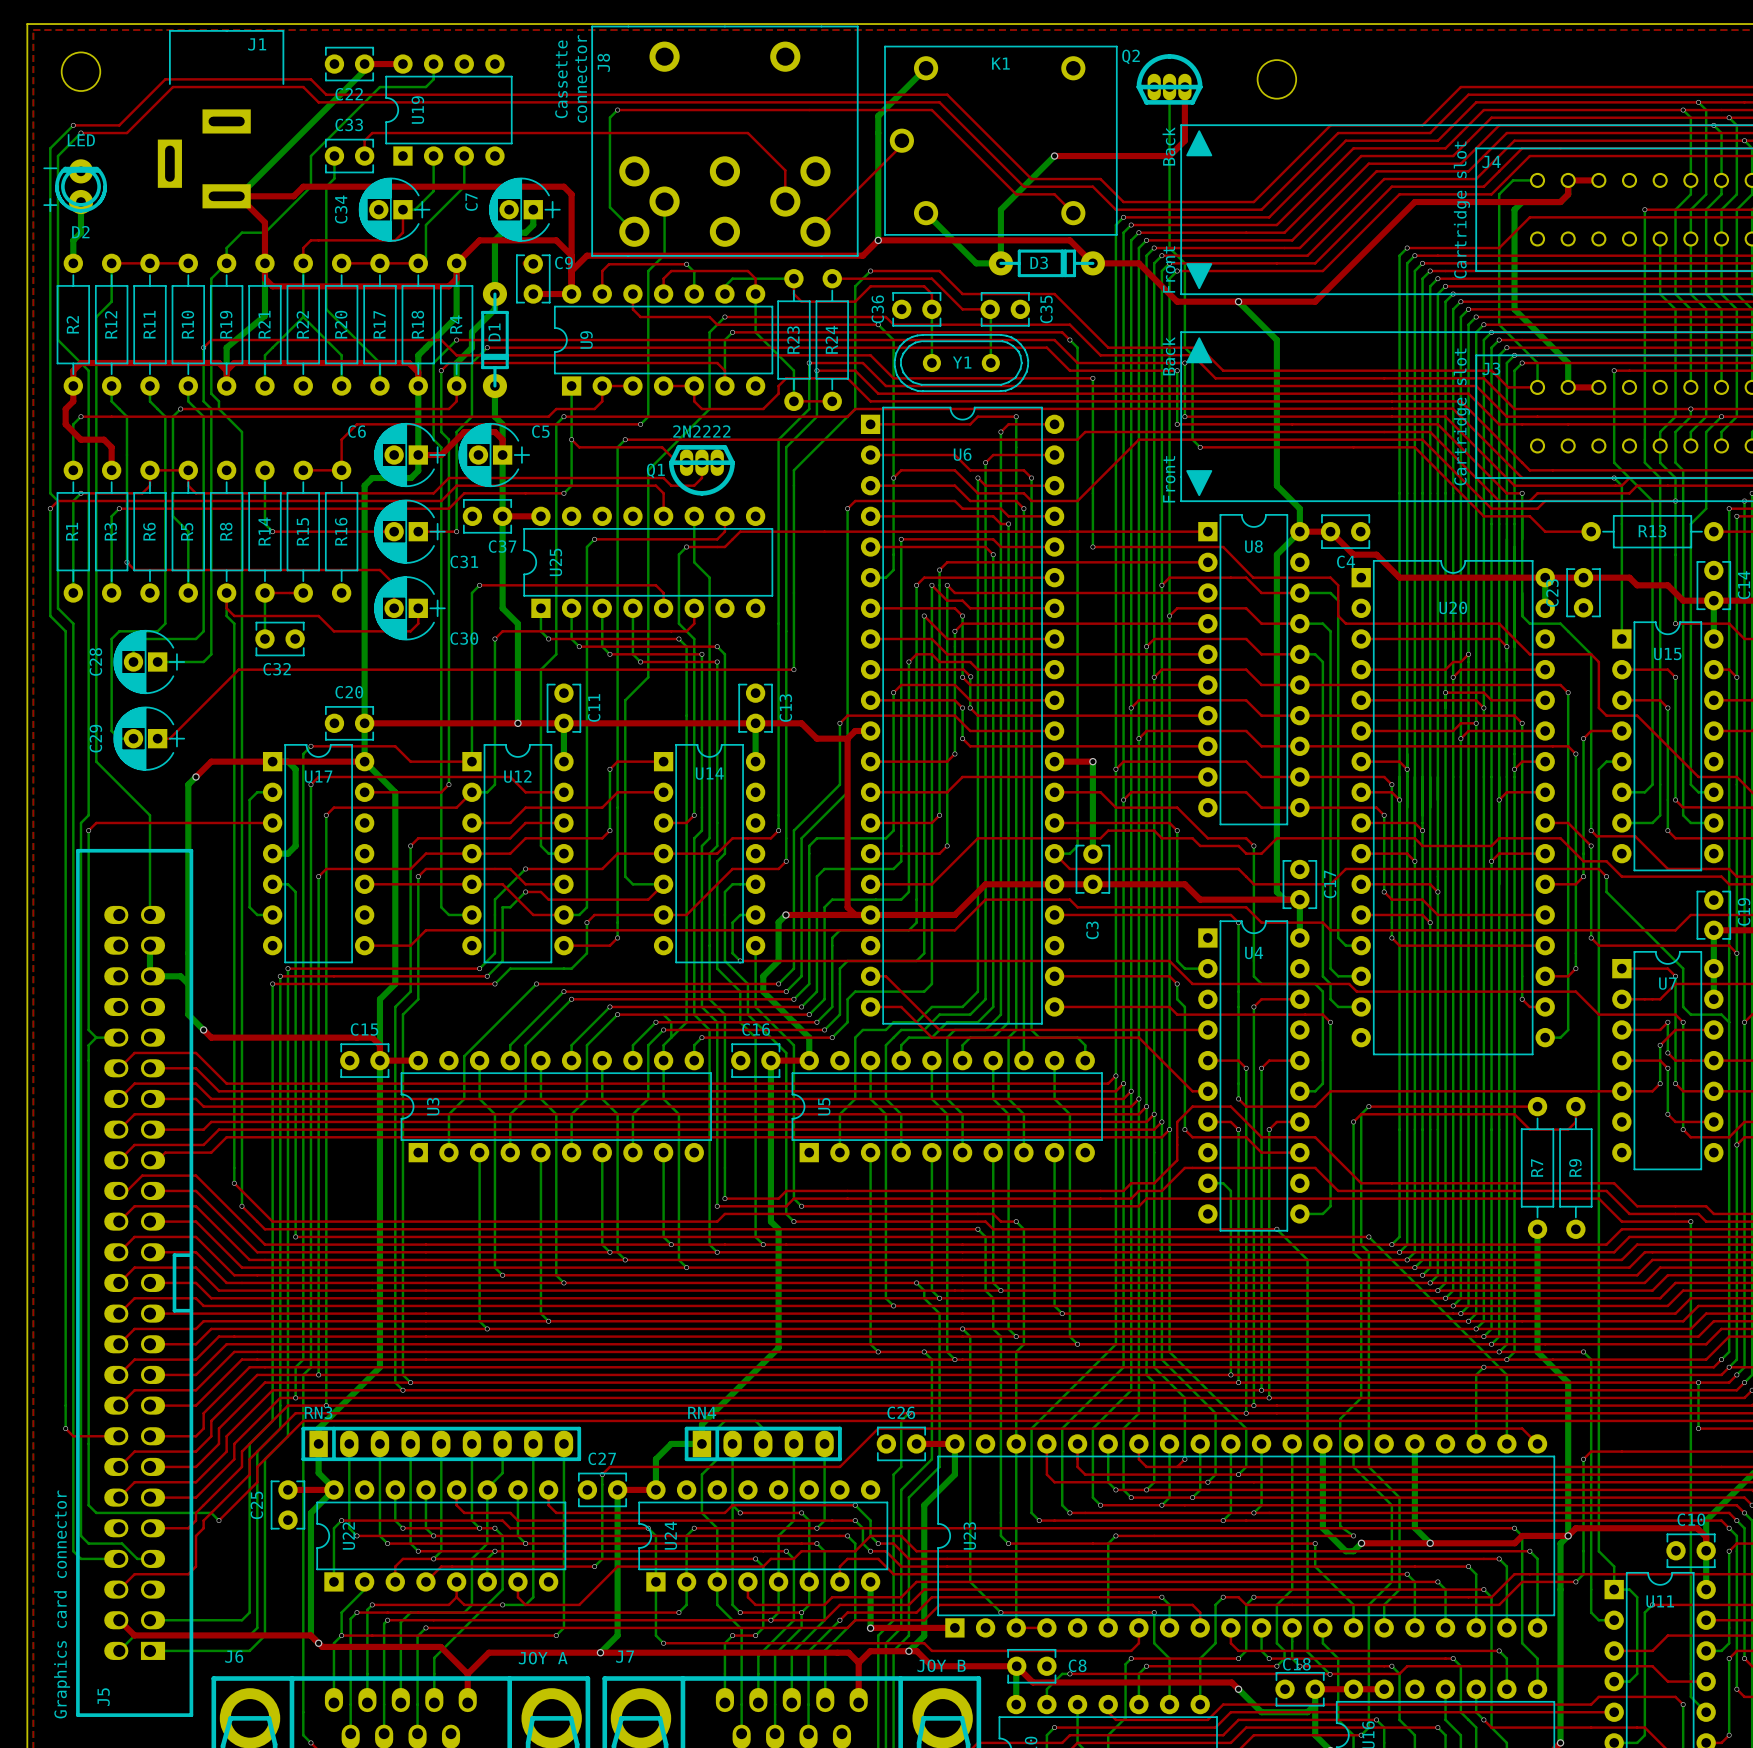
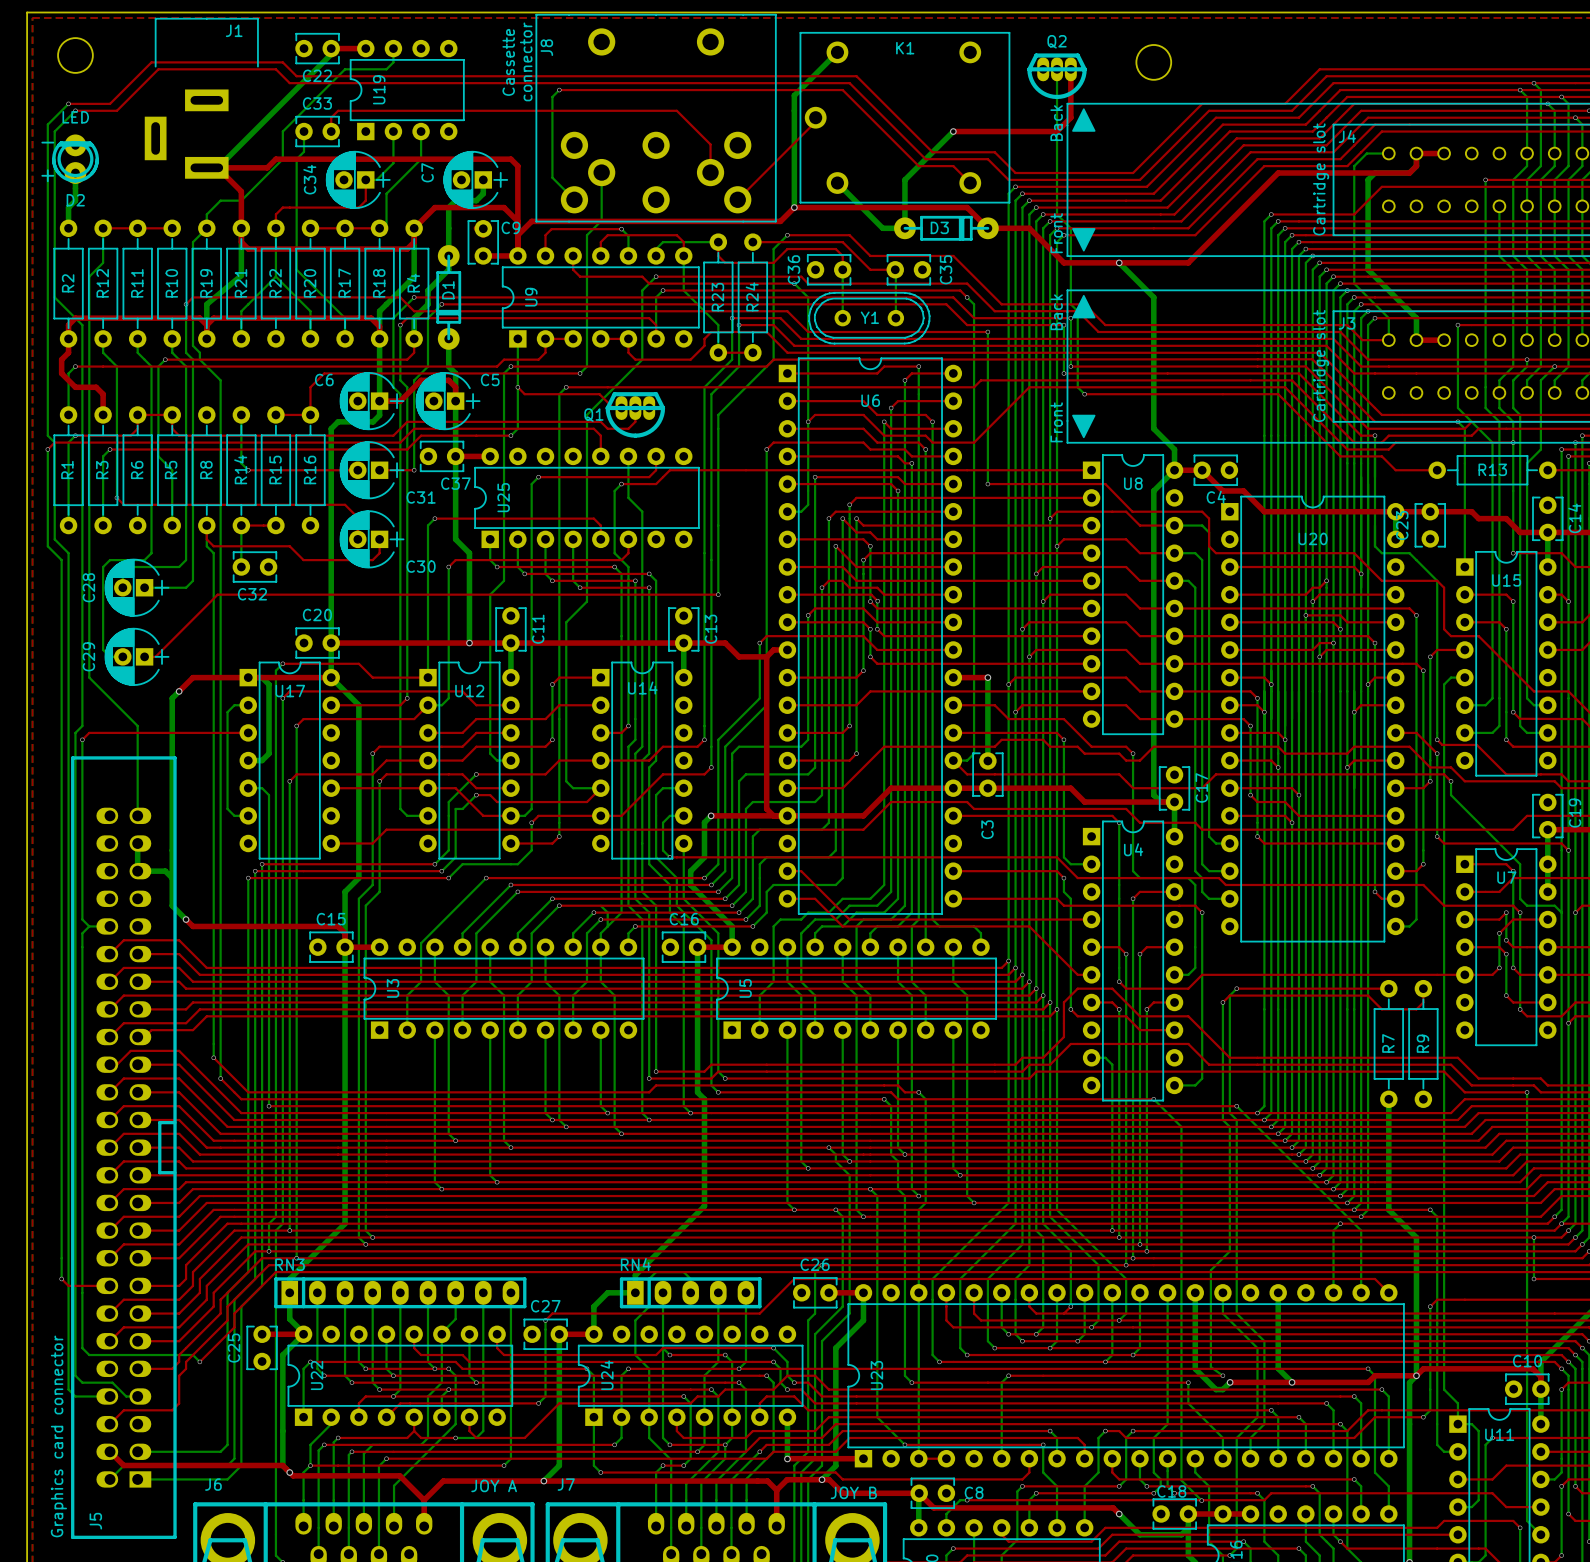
Q2 name position: Q2 (1131, 56) -> Q2 (1057, 41)
Q2 rotation: 0° (1169, 79) -> 180° (1057, 76)
Q1 value: 2N2222 (701, 431) -> none

